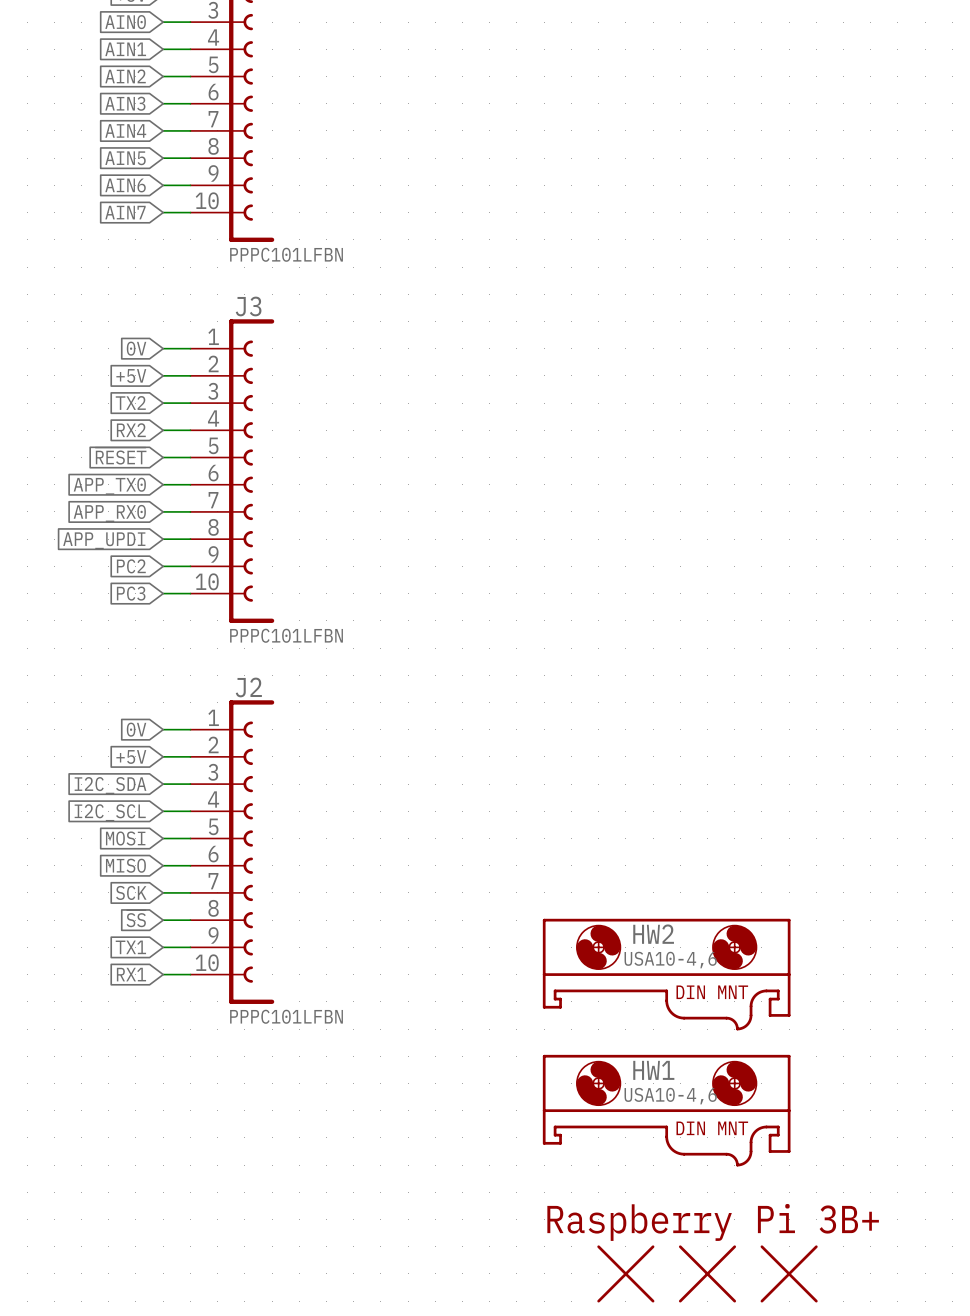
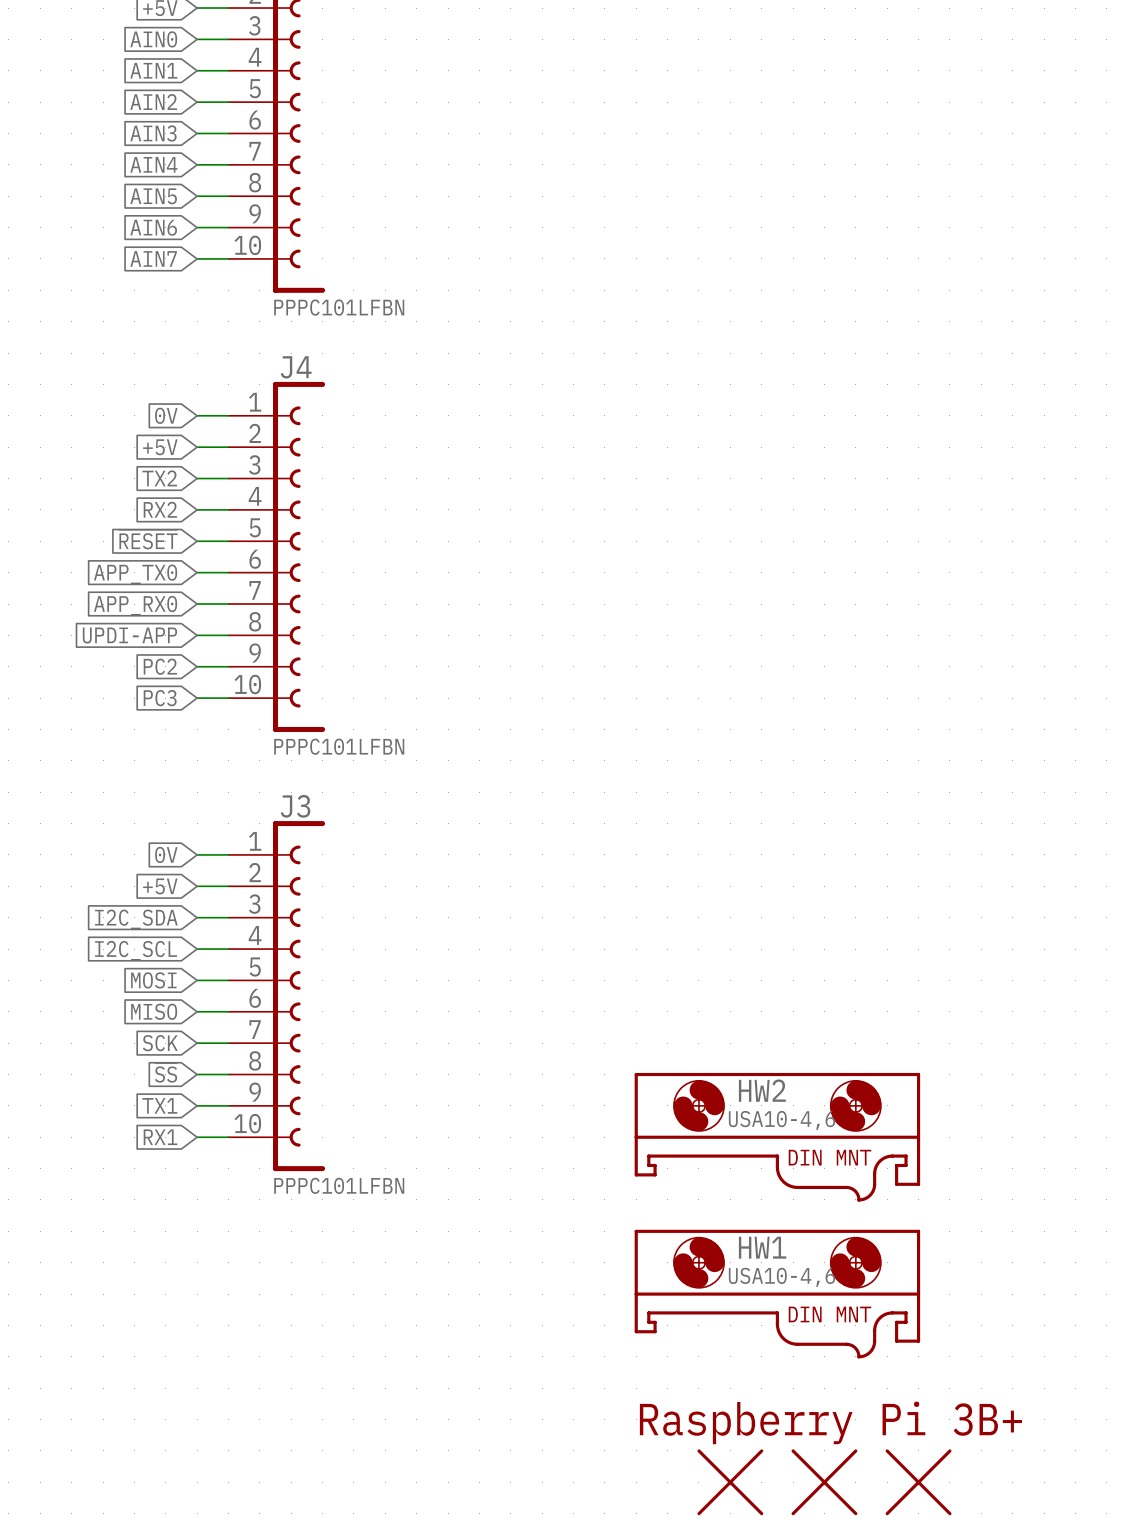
J3 name: J3 (248, 306) -> J4 (296, 367)
global label: APP_UPDI (104, 540) -> UPDI-APP (129, 635)
J2 name: J2 (248, 687) -> J3 (295, 806)

